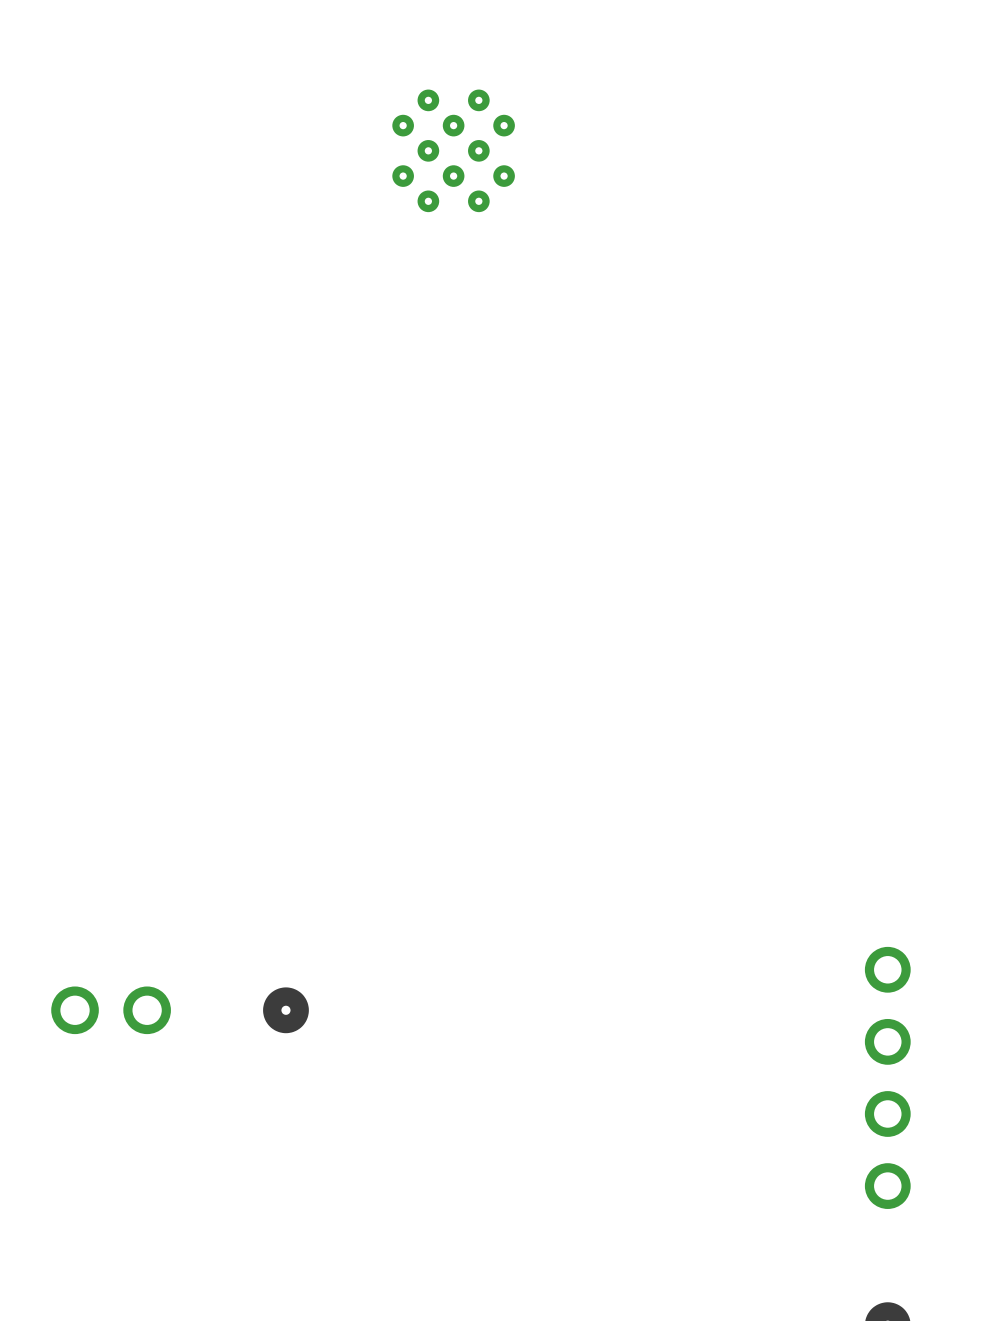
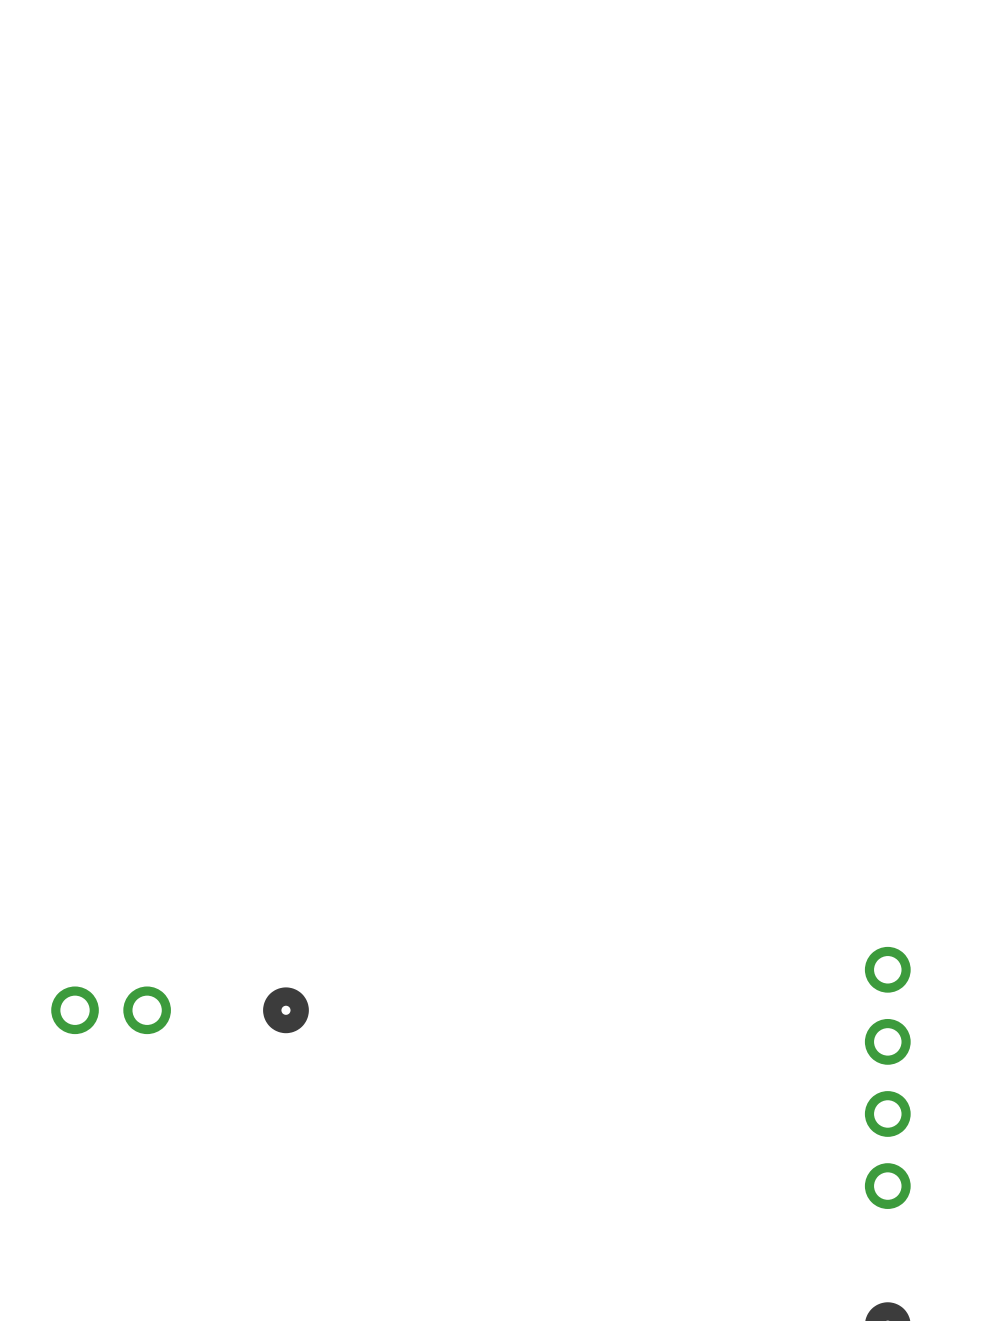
part: (453, 150) -> none

